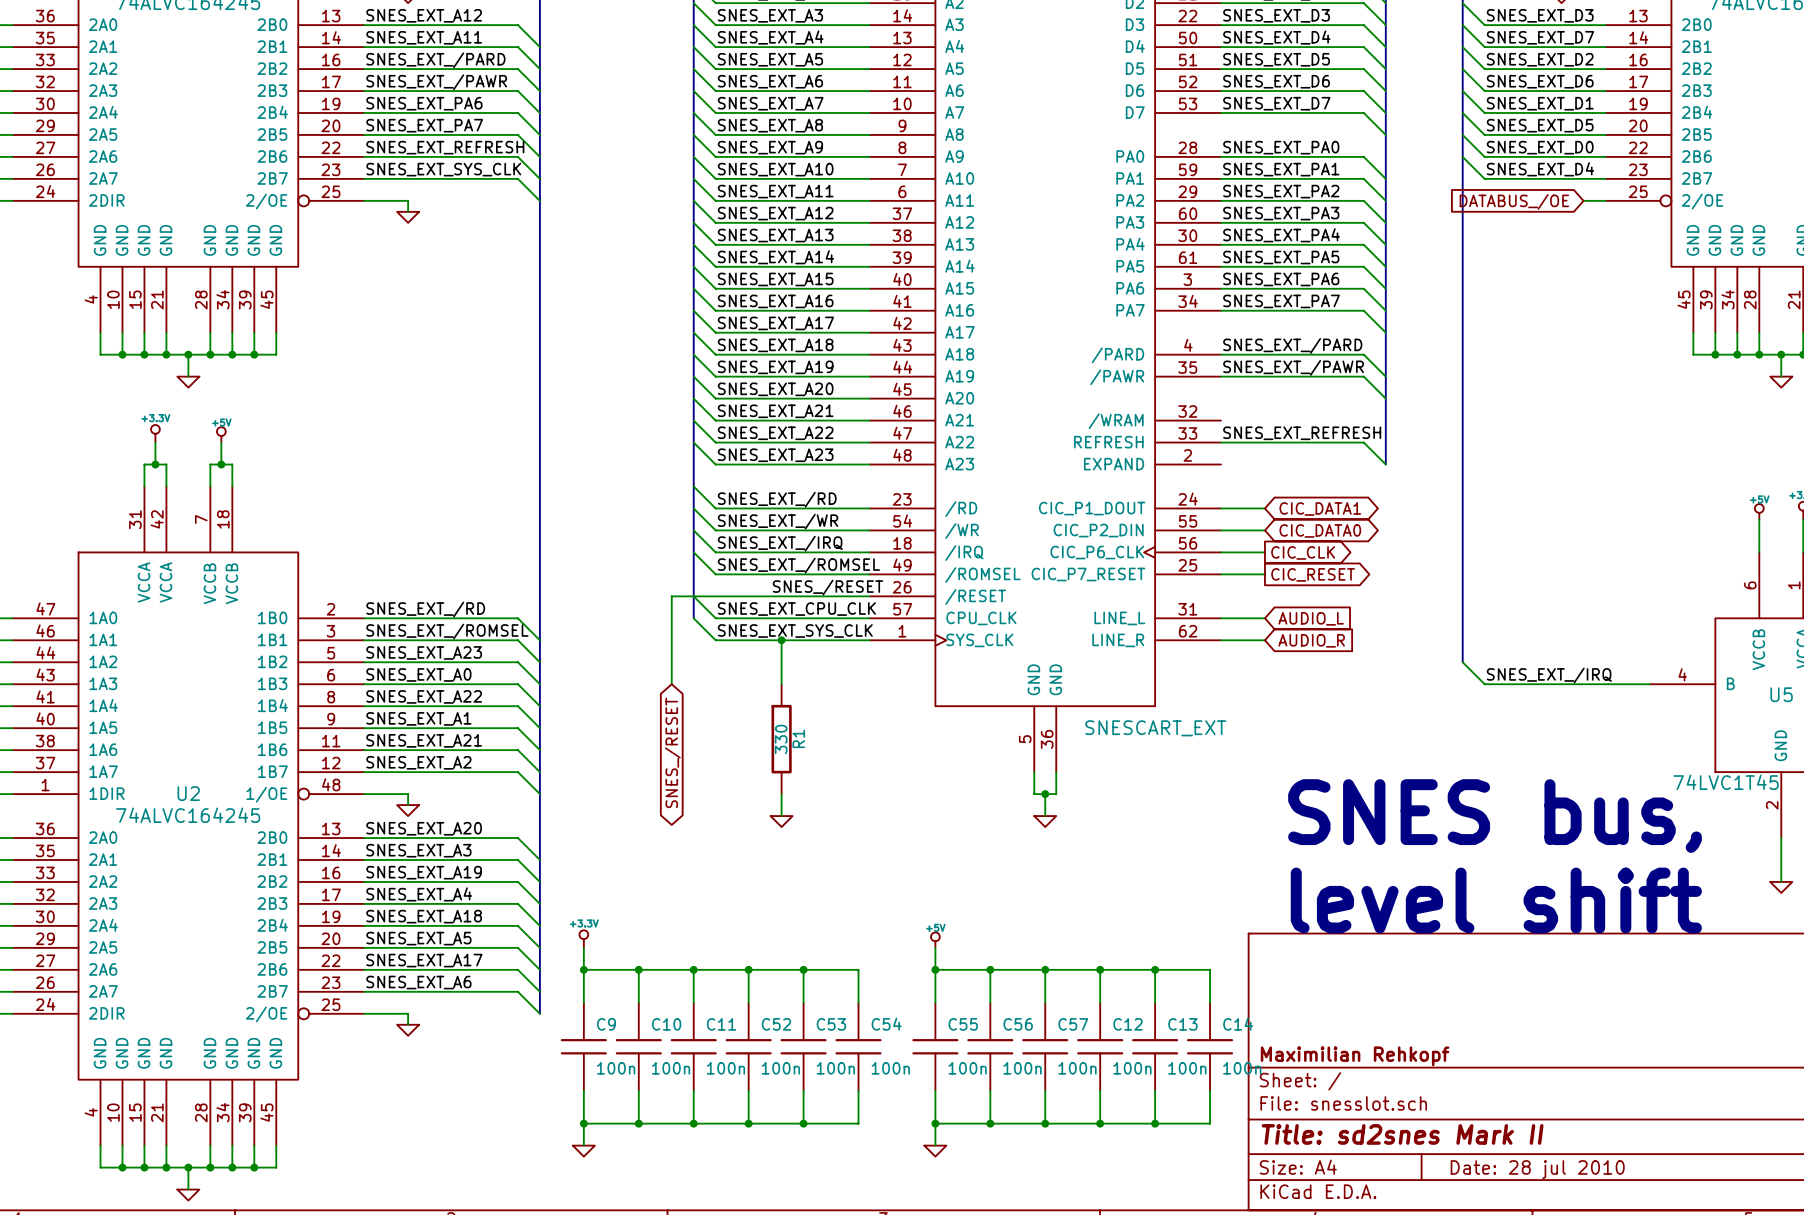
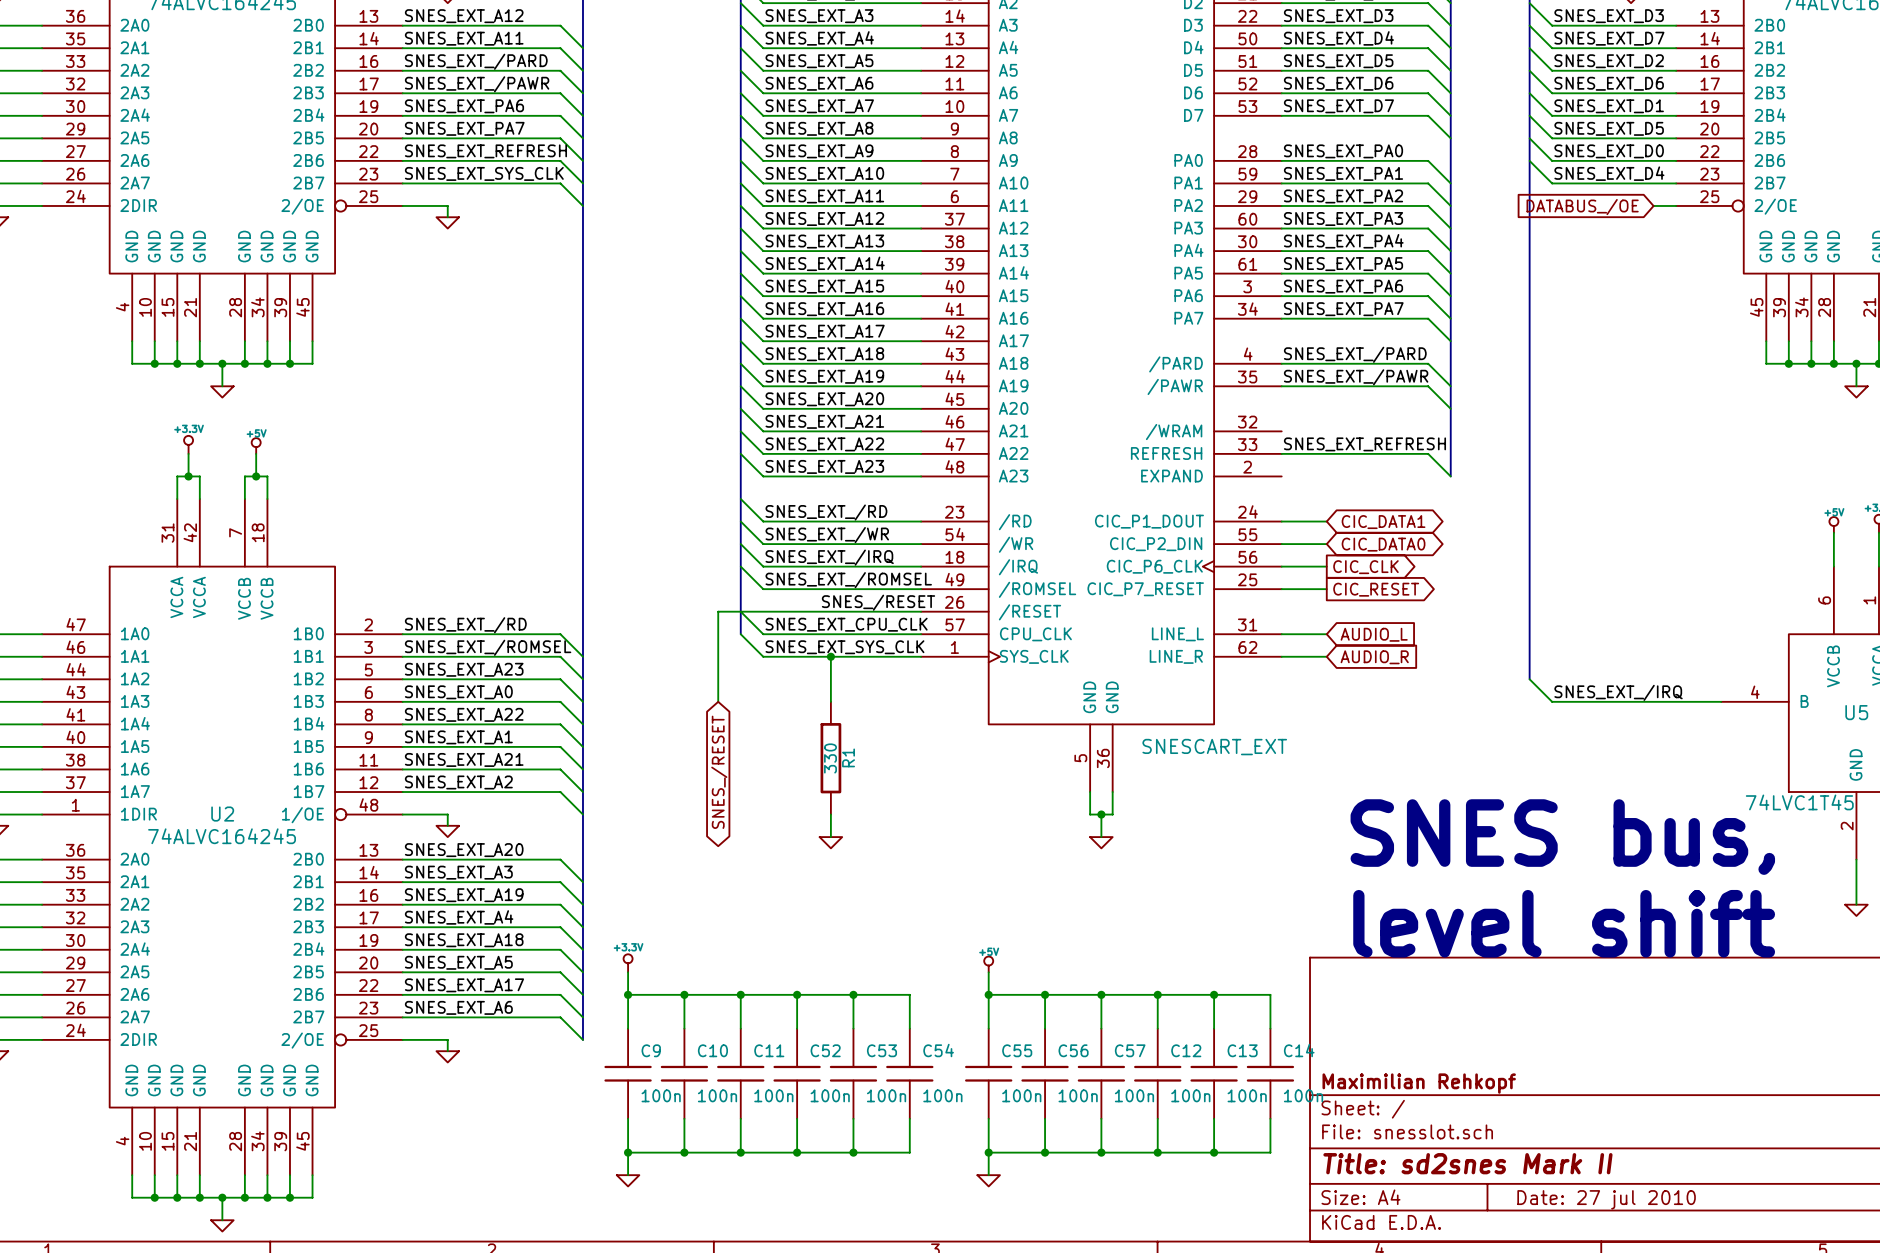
title block: Date: 28 jul 2010 (1537, 1169) -> Date: 27 jul 2010 (1606, 1199)

